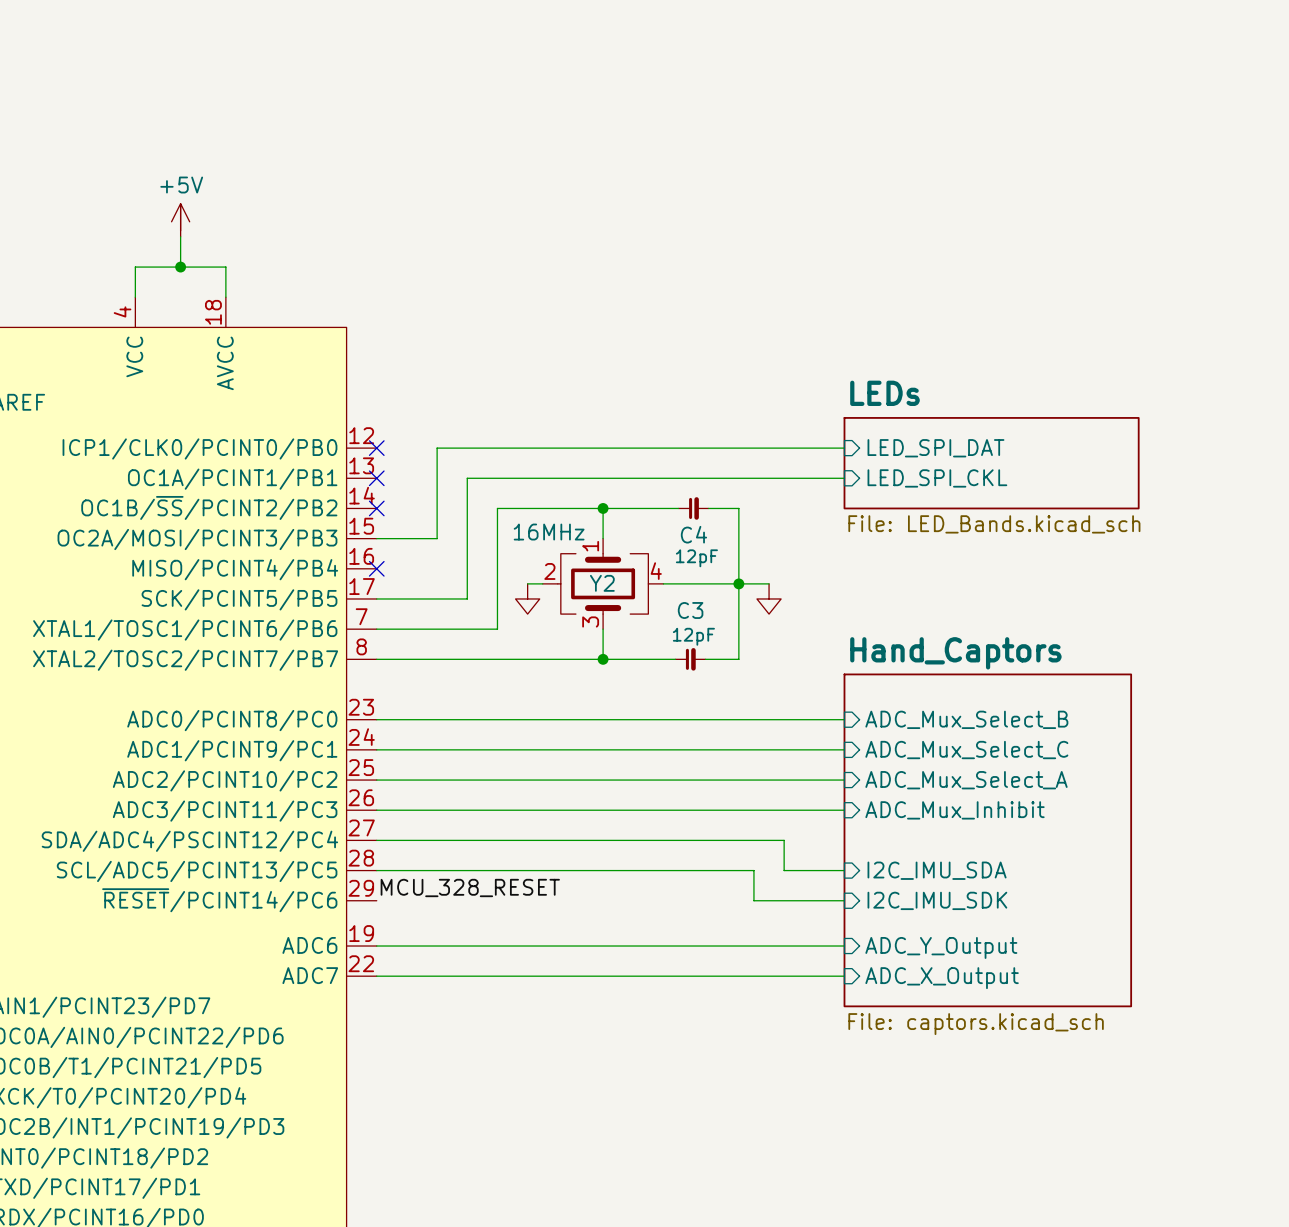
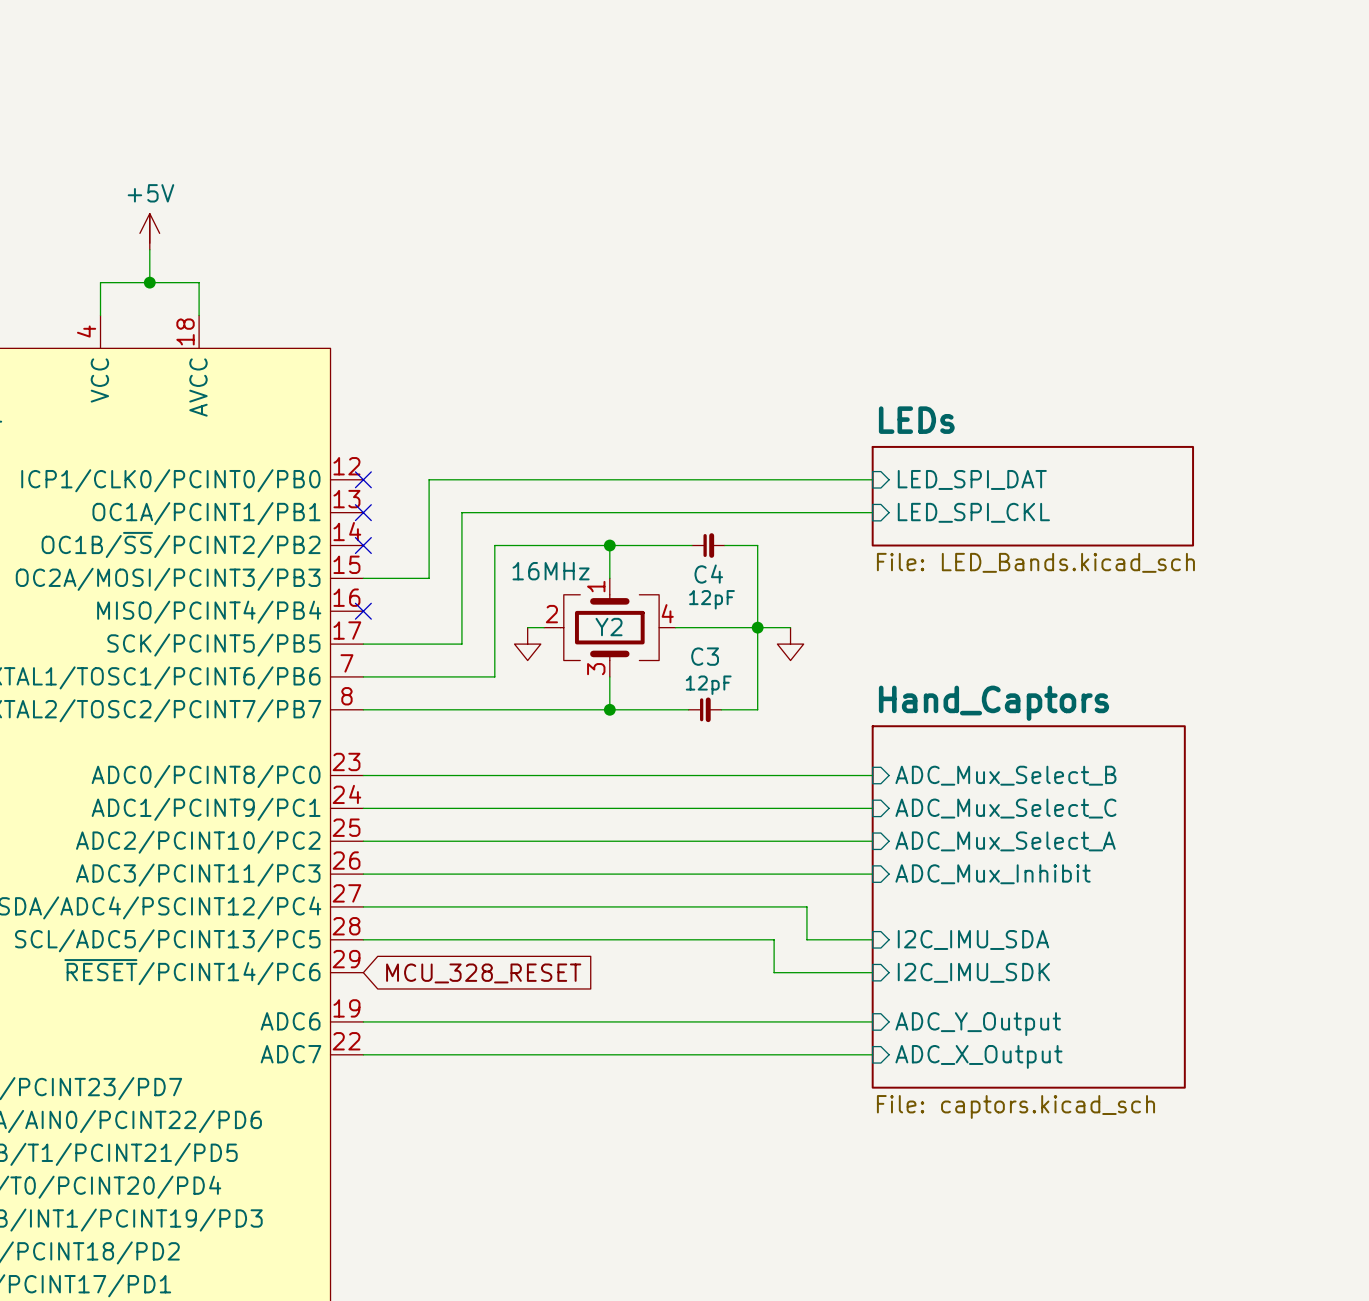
label: MCU_328_RESET (470, 888) -> none
global label: none -> MCU_328_RESET (483, 973)

